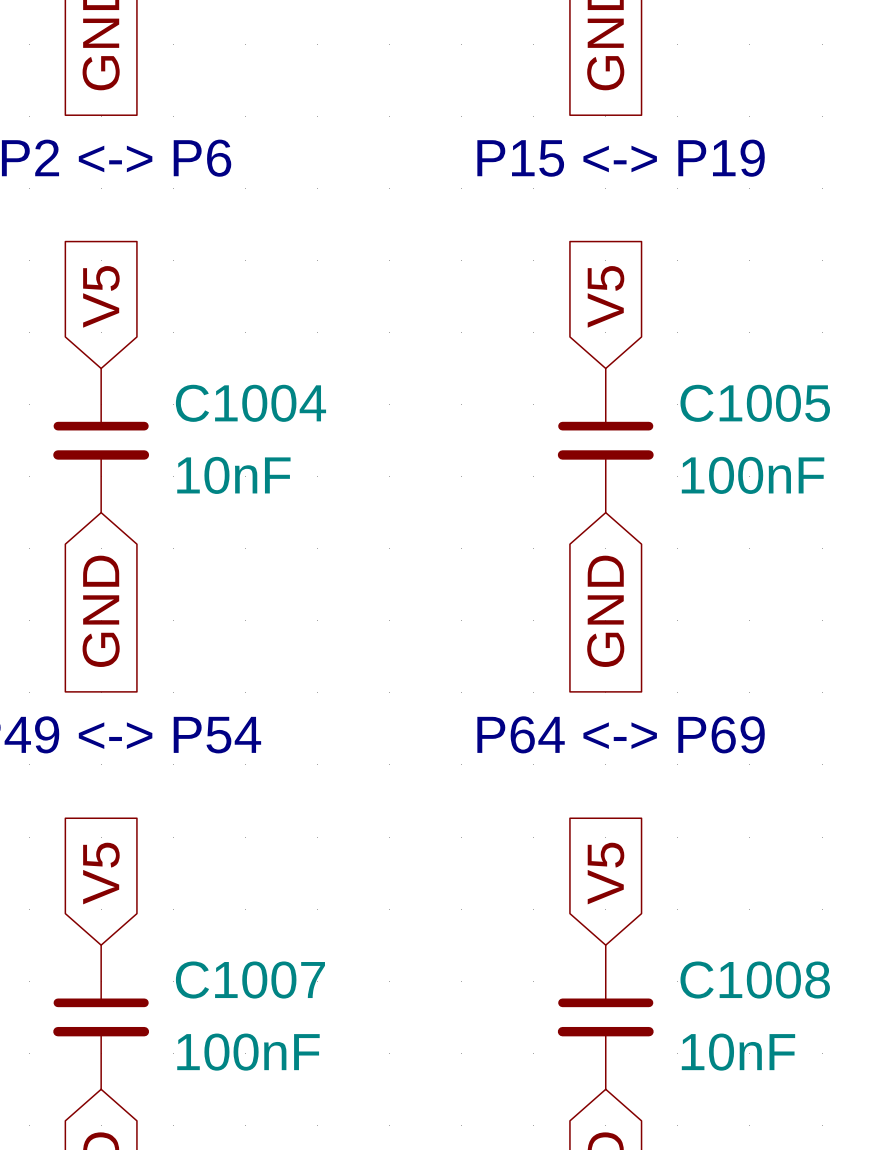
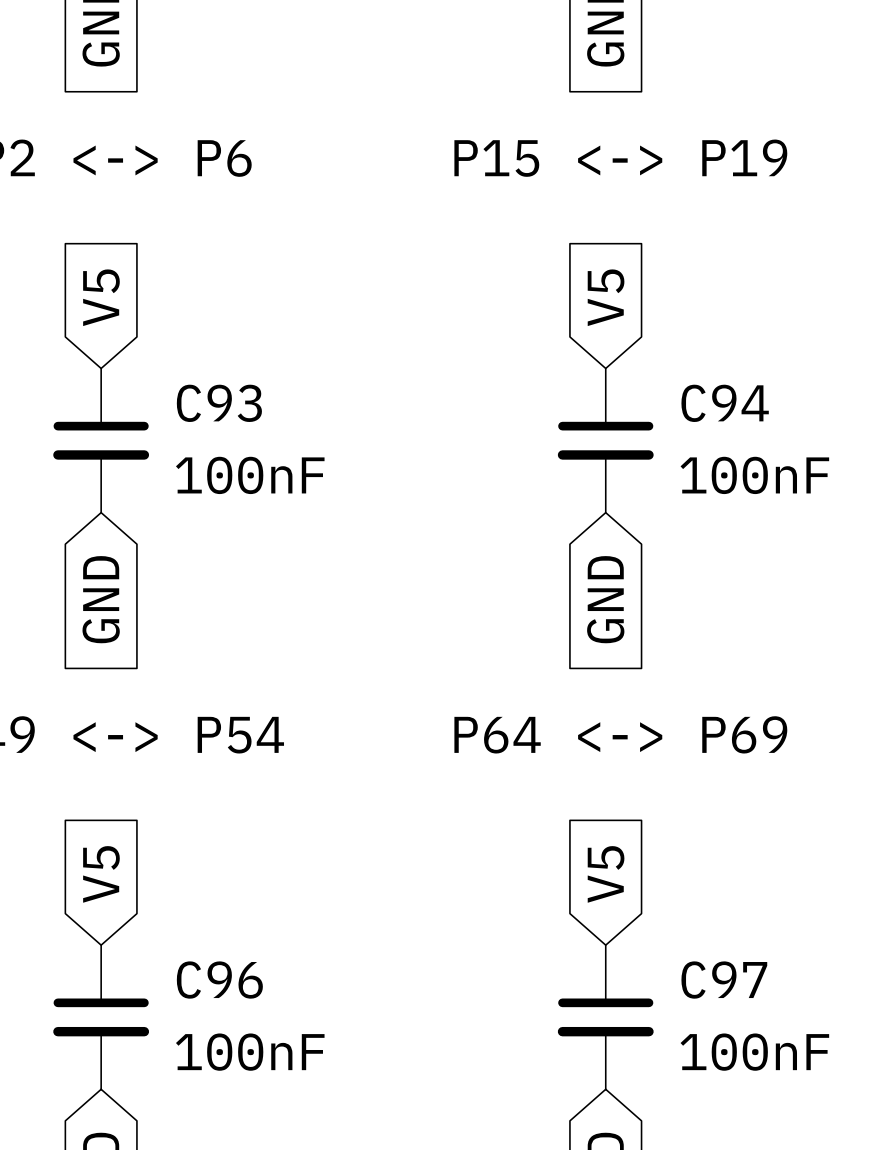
C1004 name: C1004 (250, 403) -> C93 (219, 403)
C1005 name: C1005 (755, 403) -> C94 (725, 403)
C1004 value: 10nF (233, 475) -> 100nF (250, 475)
C1007 name: C1007 (250, 980) -> C96 (219, 980)
C1008 name: C1008 (755, 980) -> C97 (724, 980)
C1008 value: 10nF (738, 1052) -> 100nF (754, 1052)

